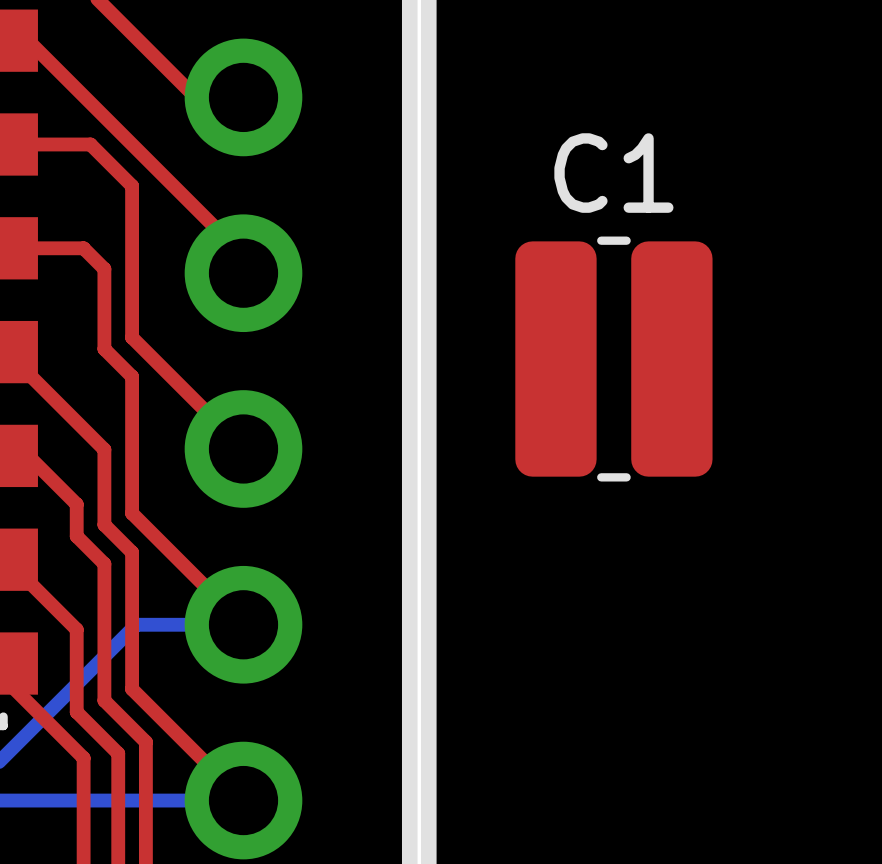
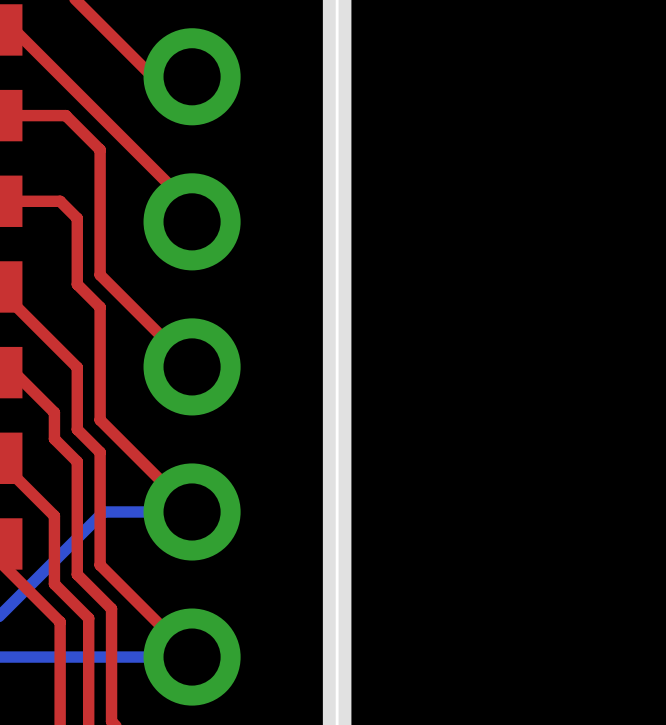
C1: (613, 359) -> none

